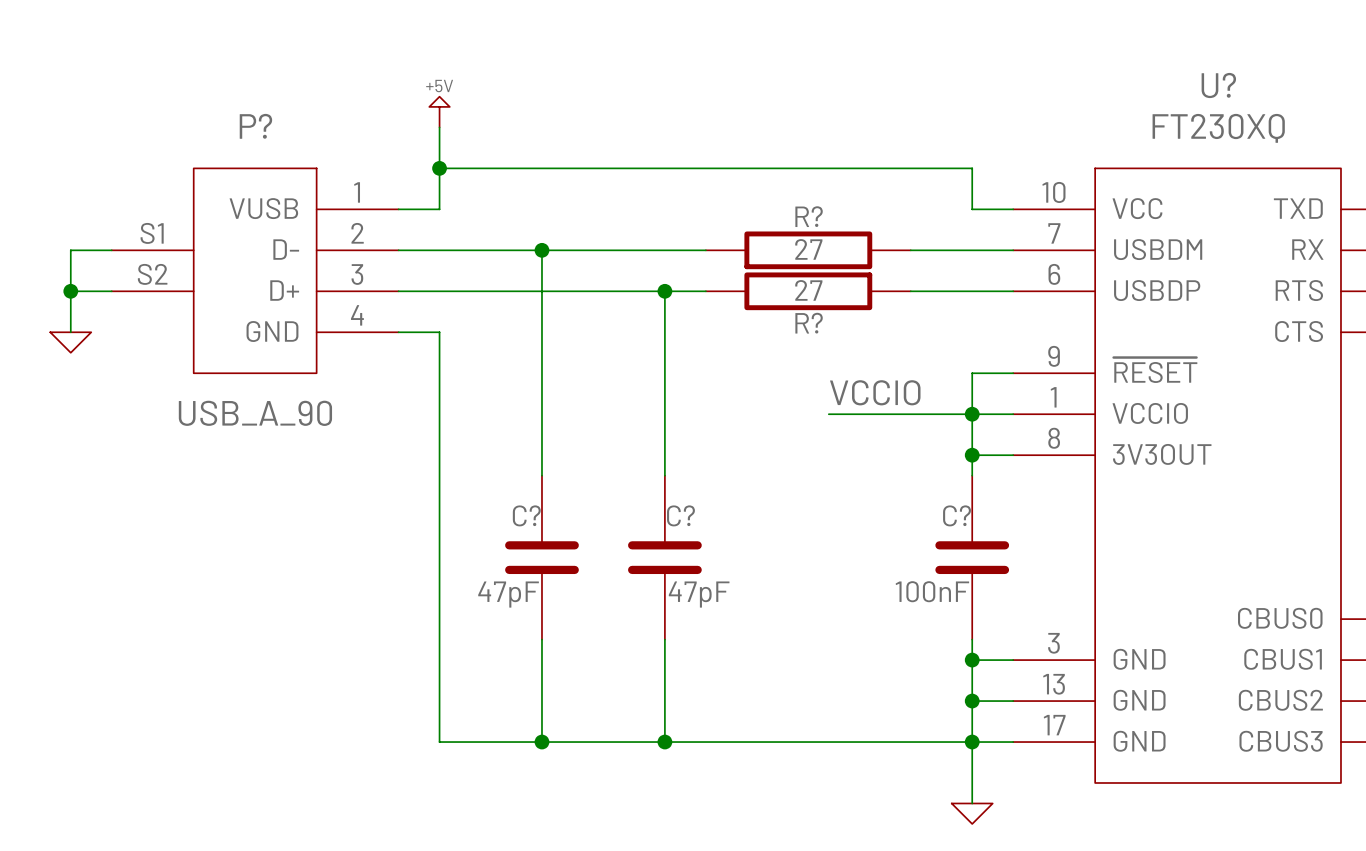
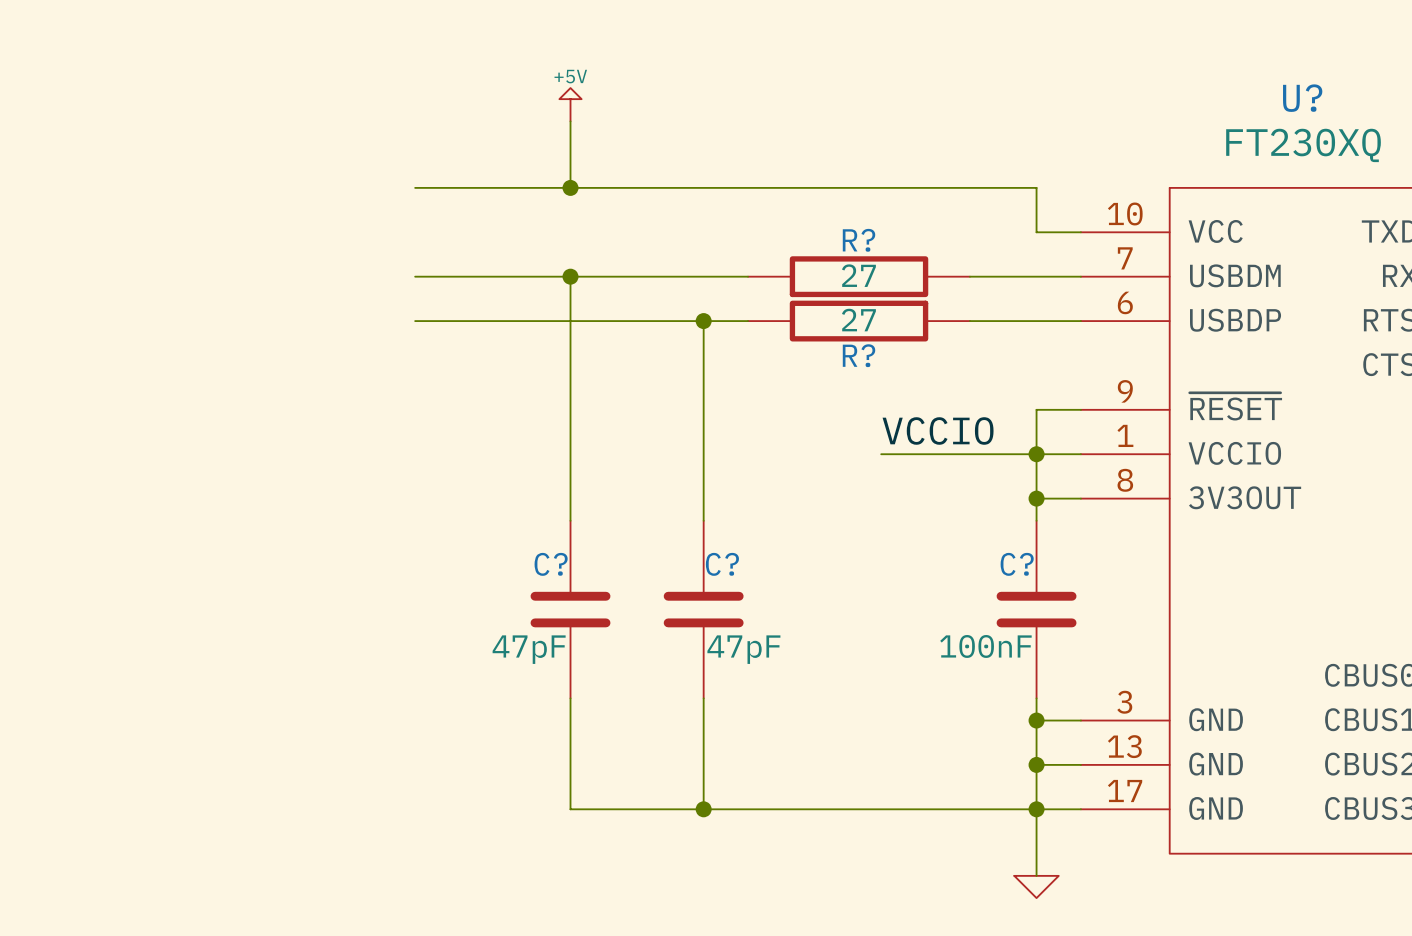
wire: none -> (570, 121) (570, 187)
power symbol position: +5V (439, 112) -> +5V (570, 104)
wire: (439, 127) (439, 209) (398, 209) -> none
junction: (439, 168) -> none
junction: none -> (570, 187)
wire: (111, 250) (70, 250) (70, 332) -> none
P?: USB_A_90 (255, 270) -> none
wire: (70, 291) (111, 291) -> (415, 187) (459, 187)
junction: (70, 291) -> none
wire: (398, 332) (439, 332) (439, 742) (541, 742) -> none
power symbol: (70, 342) -> none
junction: (541, 742) -> none

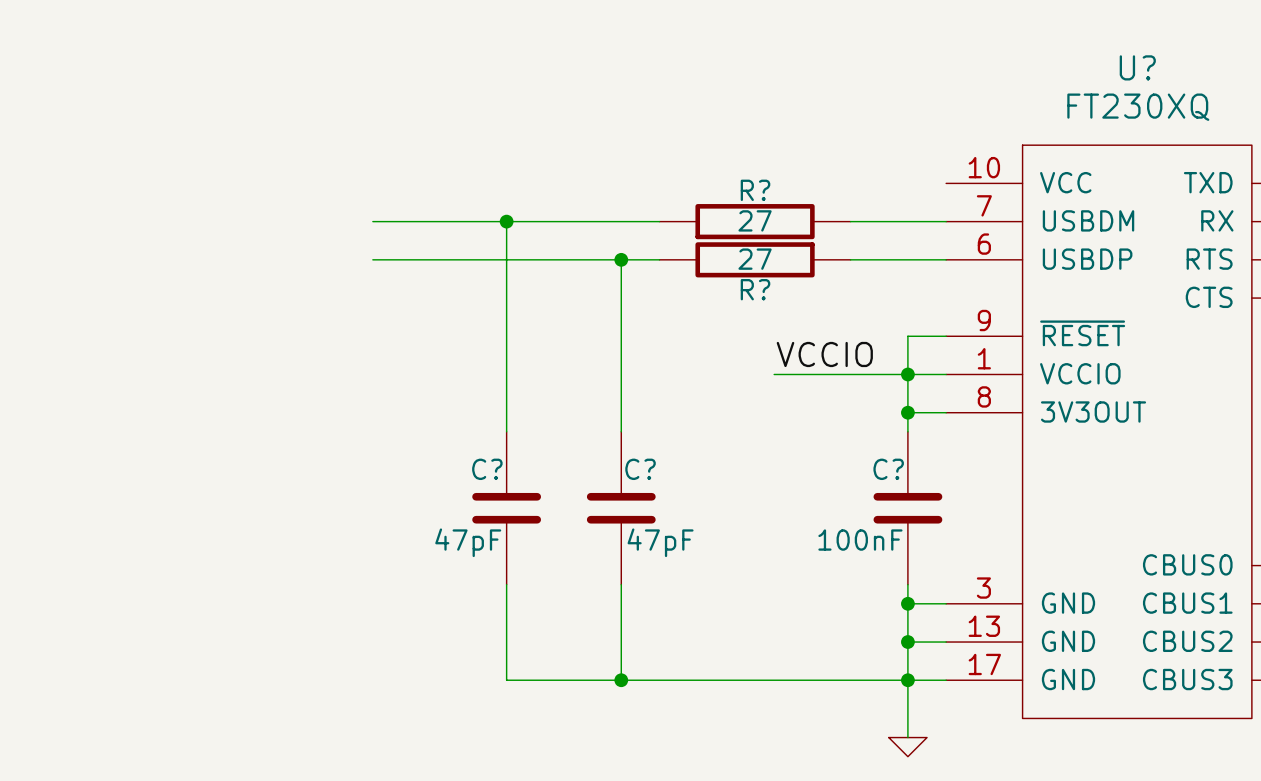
power symbol: +5V (570, 104) -> none
wire: (570, 121) (570, 187) -> none
wire: (415, 187) (1036, 187) (1036, 232) (1080, 232) -> none
junction: (570, 187) -> none

